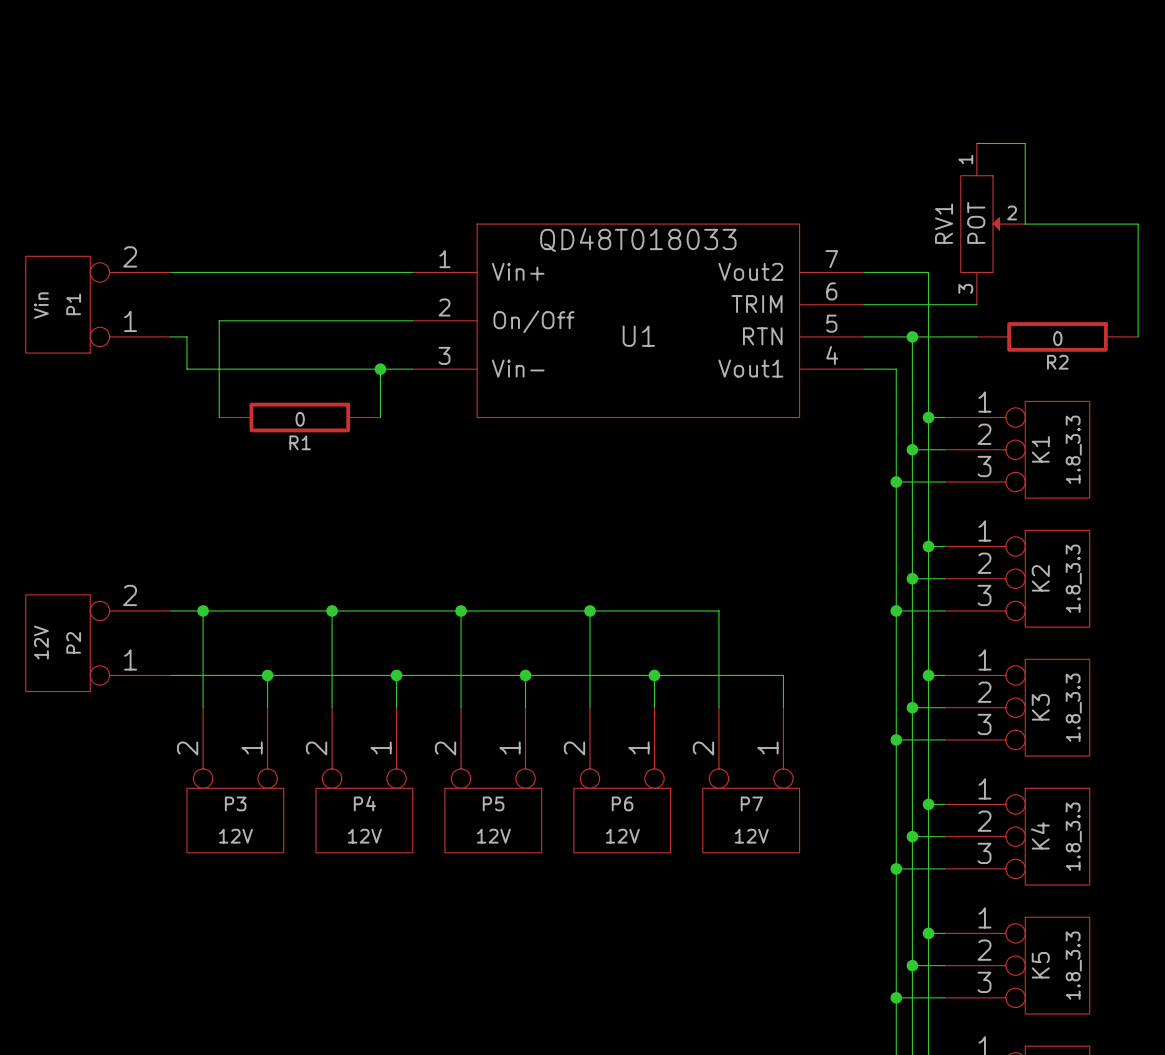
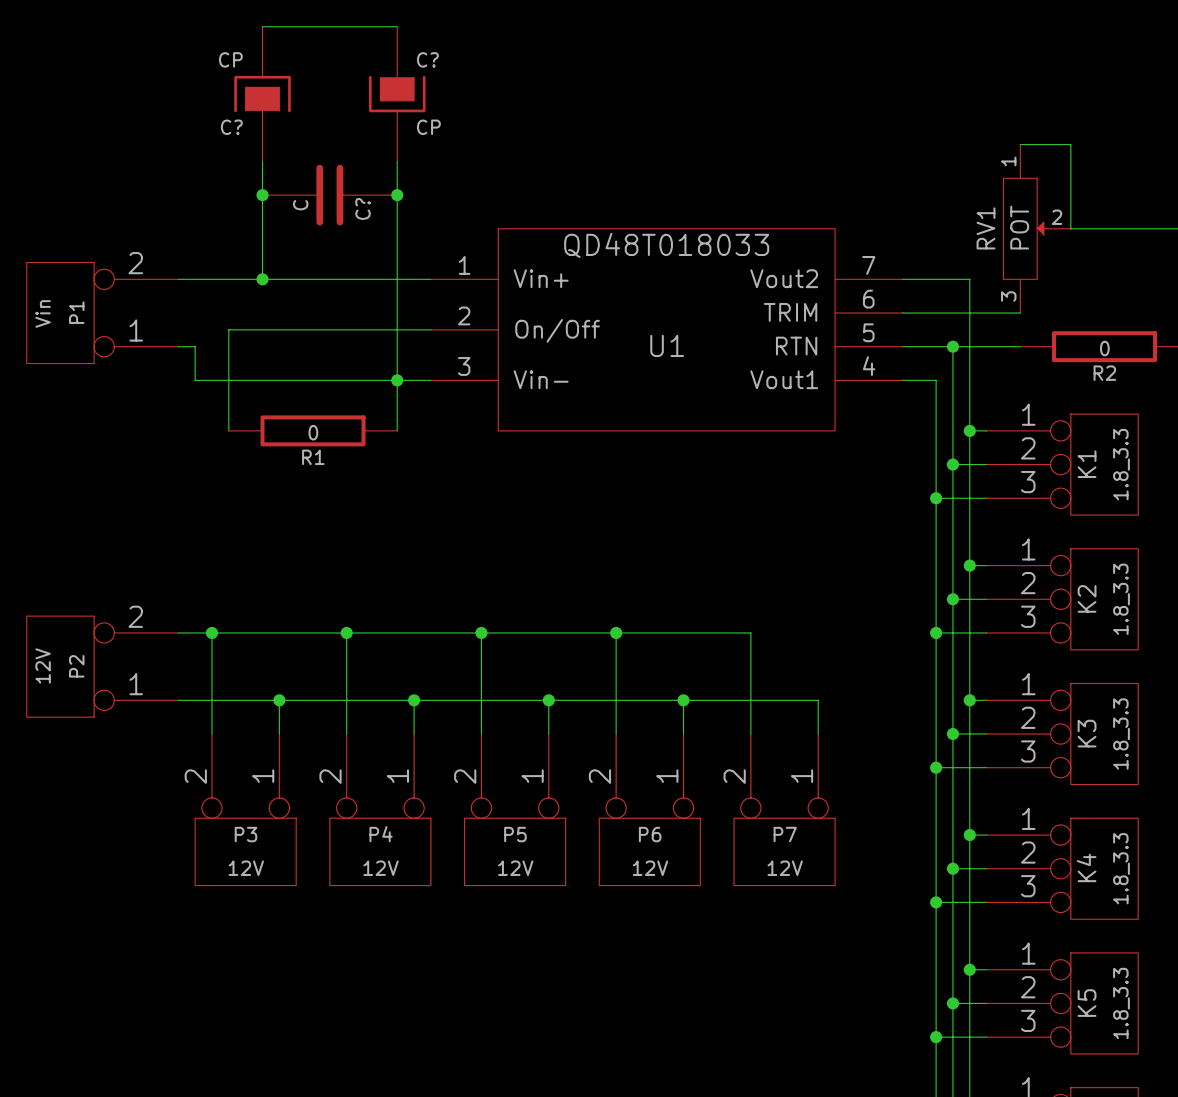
wire: none -> (262, 26) (397, 26)
C?: none -> CP (262, 94)
C?: none -> CP (397, 94)
wire: none -> (262, 161) (262, 279)
wire: none -> (397, 161) (397, 380)
junction: none -> (262, 195)
C?: none -> C (329, 195)
junction: none -> (397, 195)
junction: none -> (262, 279)

